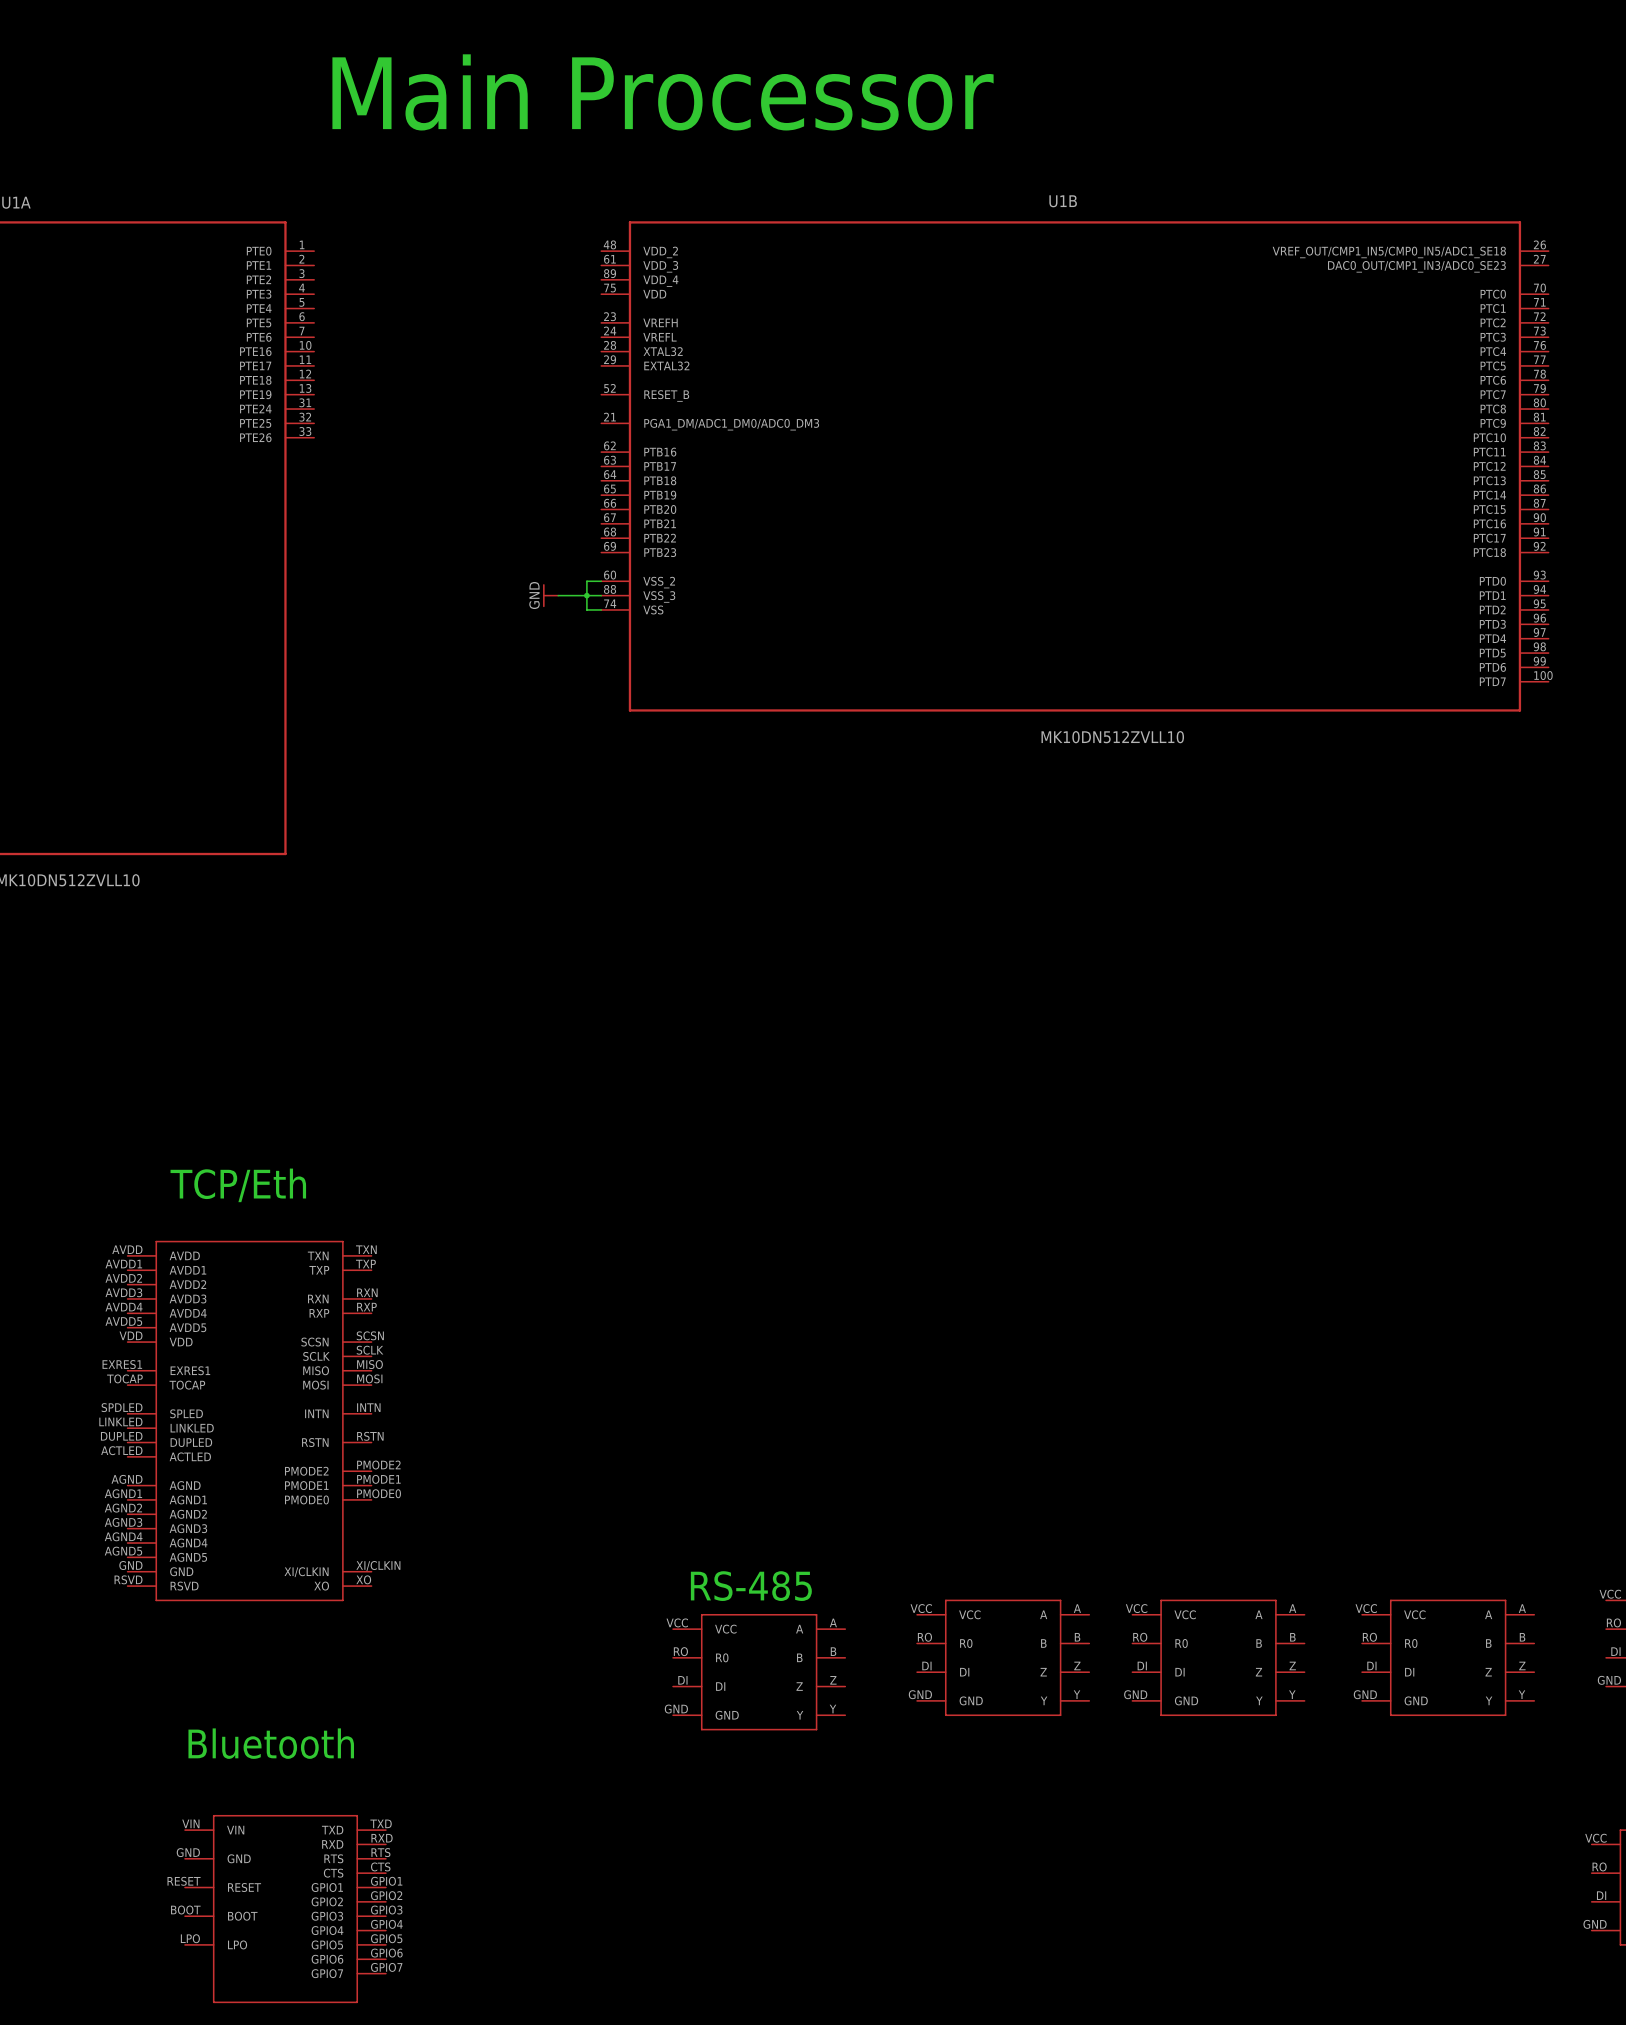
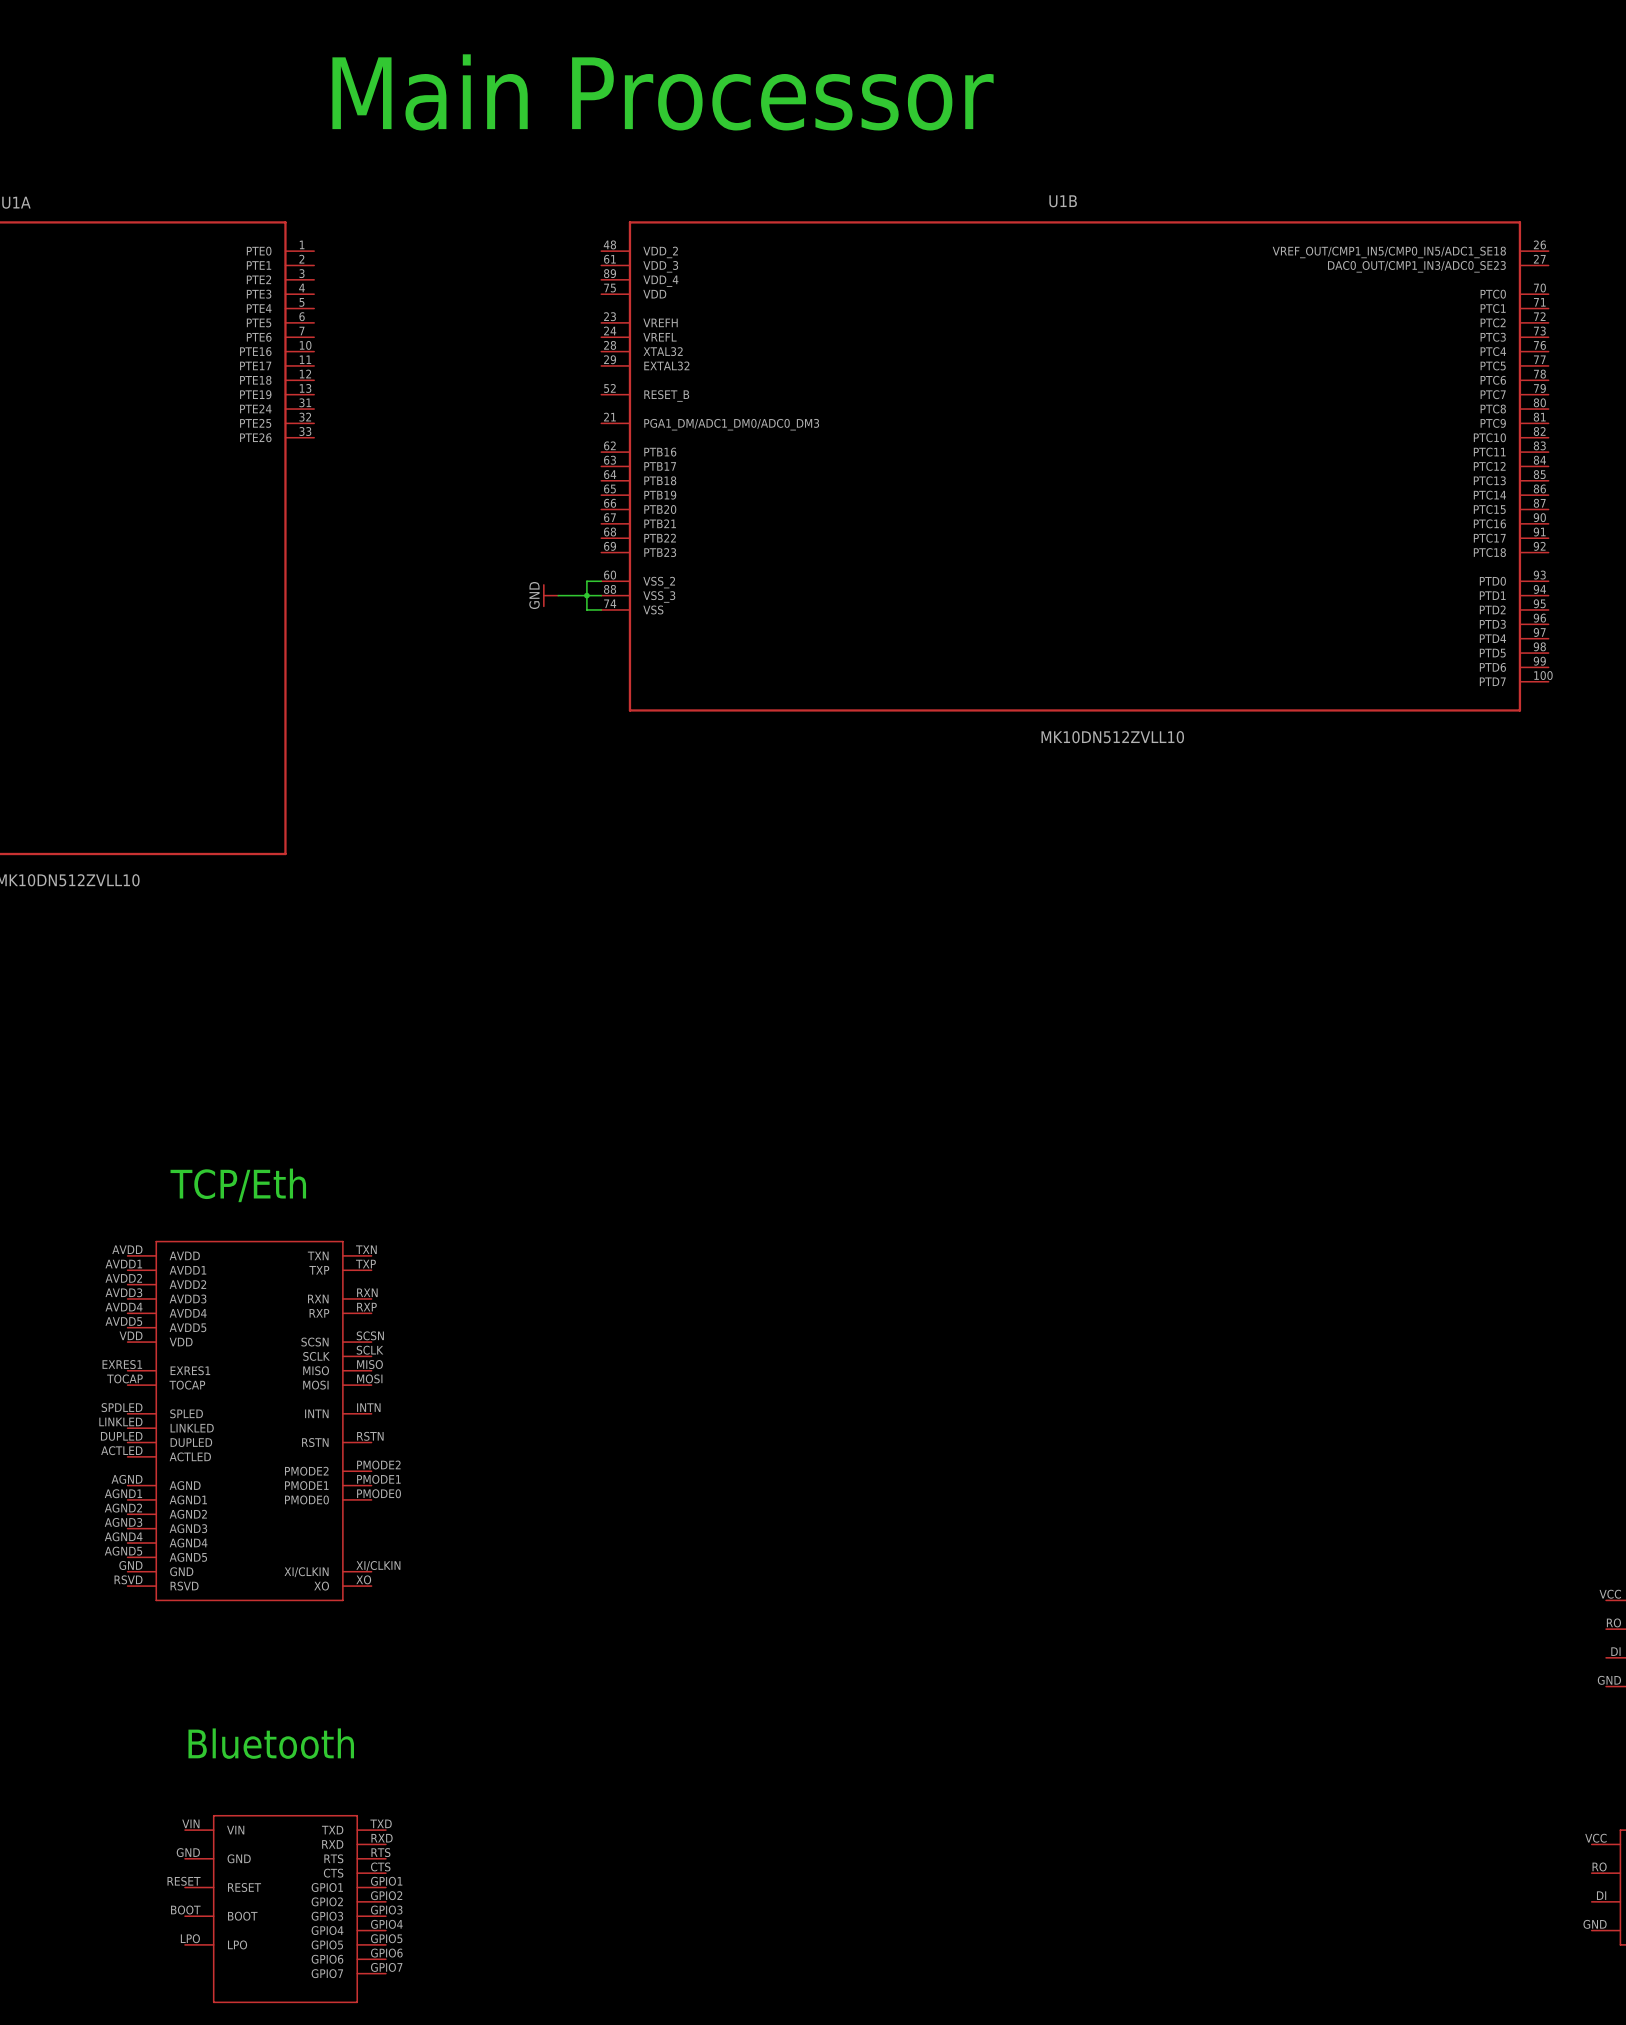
text: RS-485 (751, 1586) -> none
part: (1003, 1657) -> none
part: (1218, 1657) -> none
part: (1448, 1657) -> none
part: (759, 1672) -> none

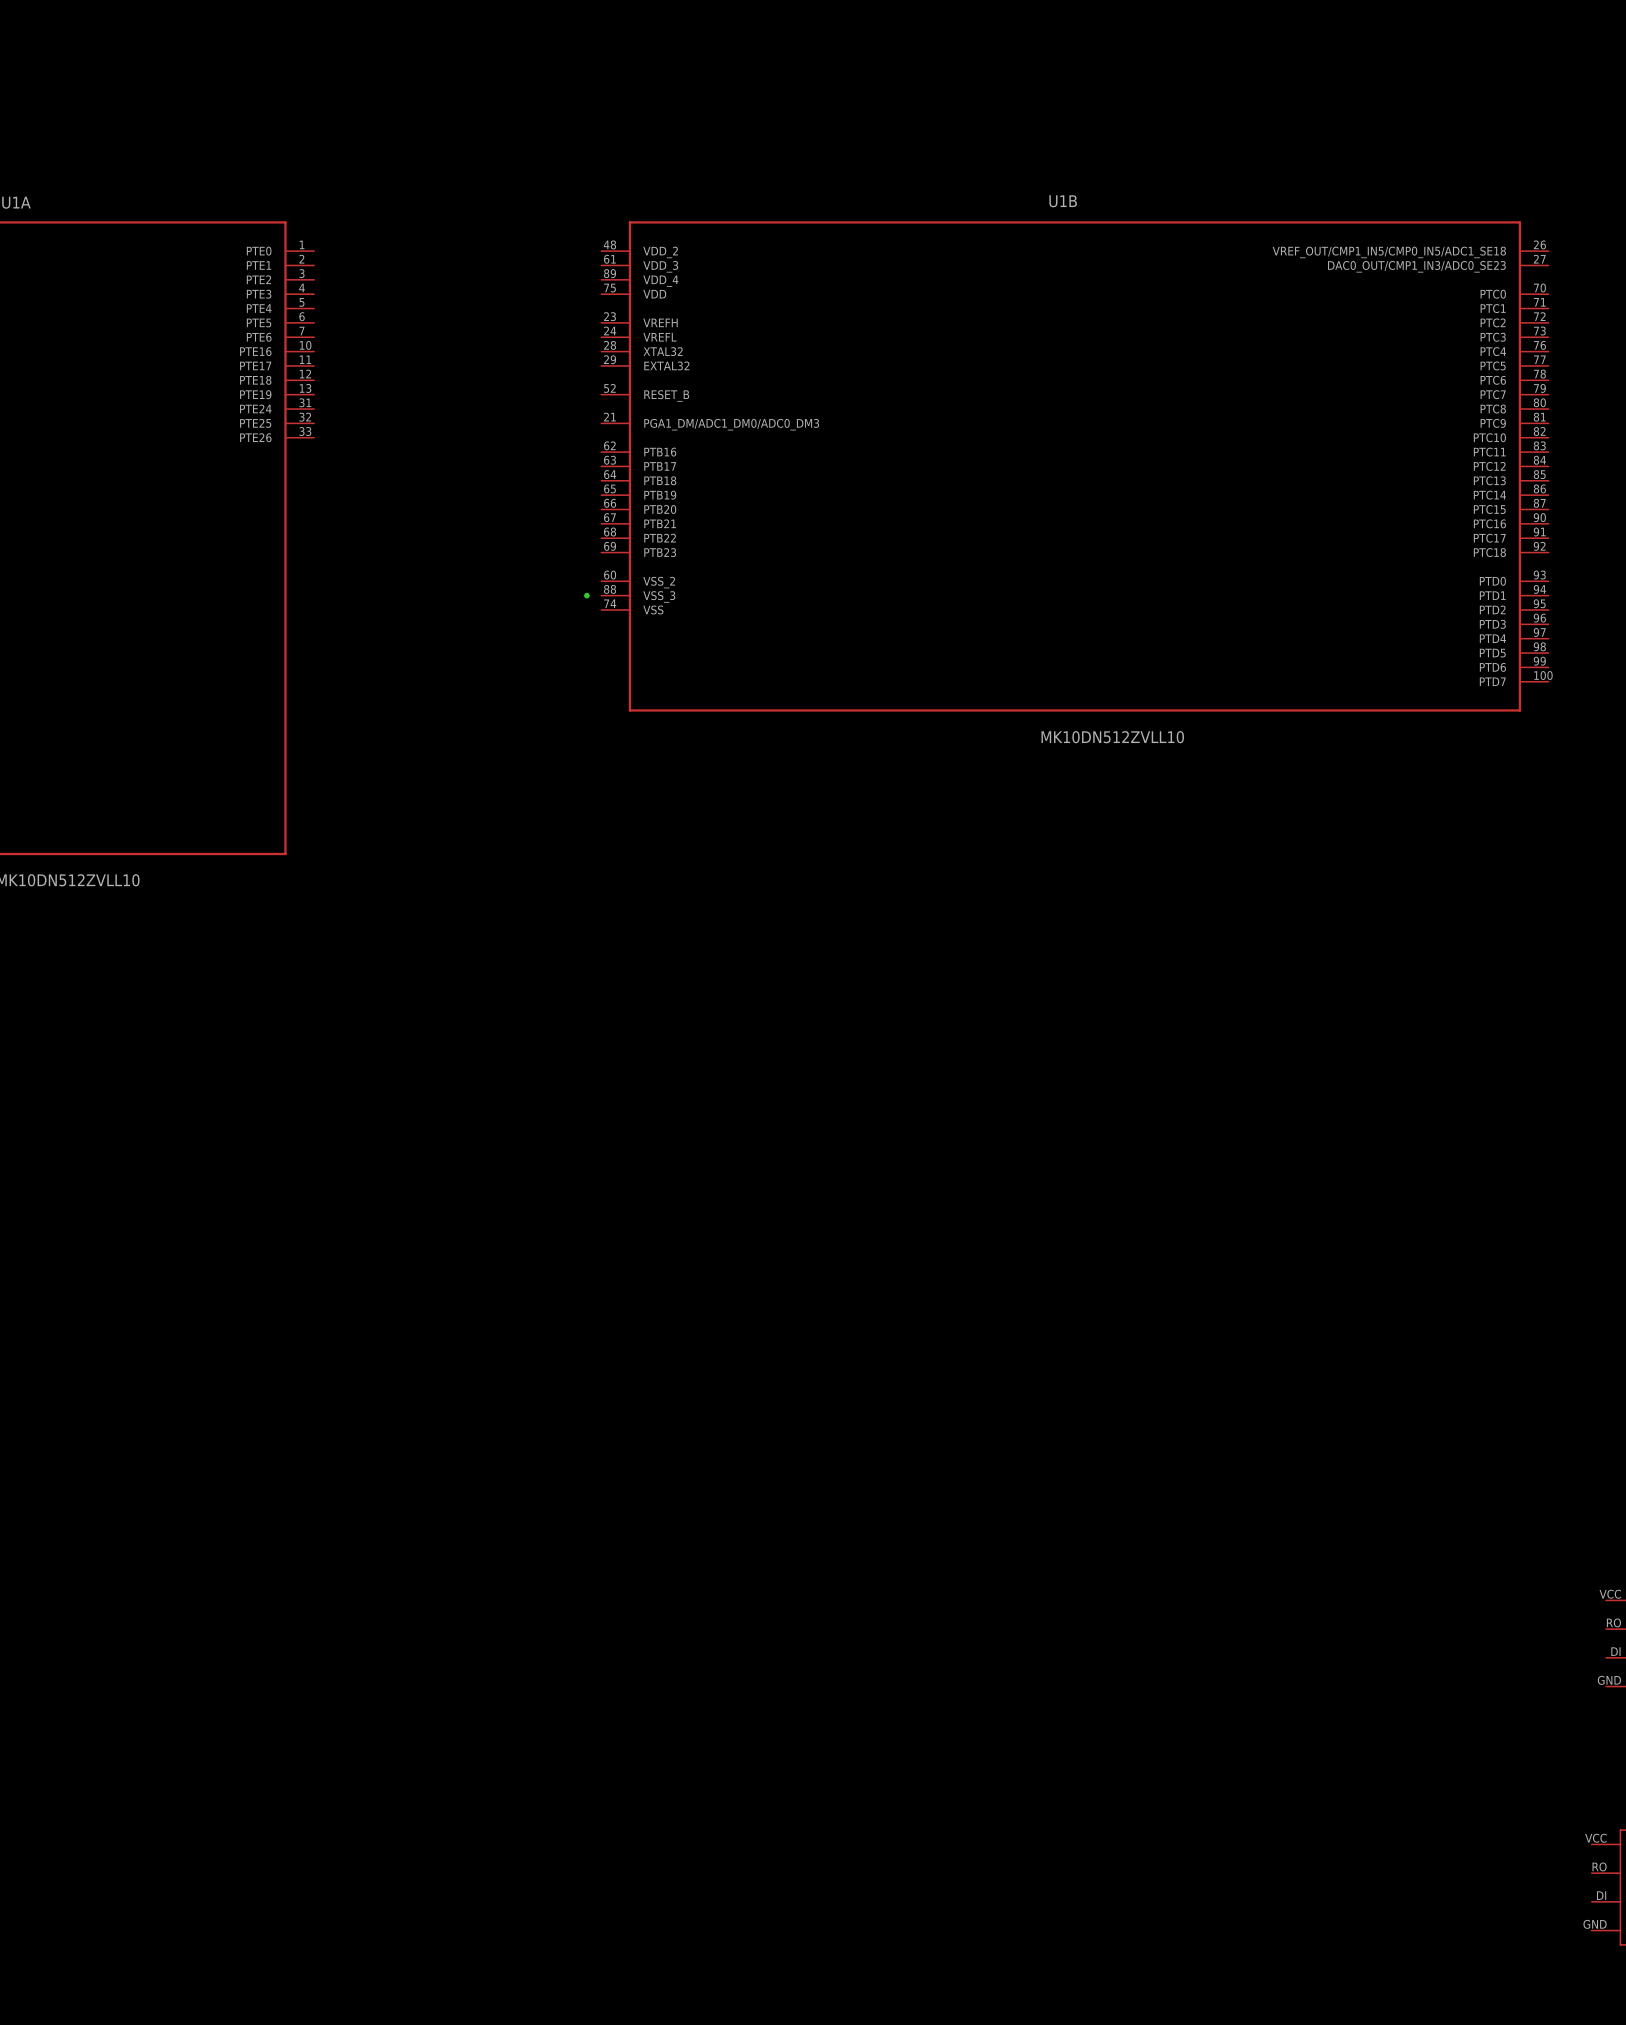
text: Main Processor (663, 92) -> none
wire: (601, 581) (586, 581) (586, 609) (601, 609) -> none
power symbol: GND (550, 595) -> none
wire: (558, 595) (601, 595) -> none
text: TCP/Eth (238, 1185) -> none
part: (249, 1420) -> none
text: Bluetooth (271, 1743) -> none
part: (285, 1909) -> none

